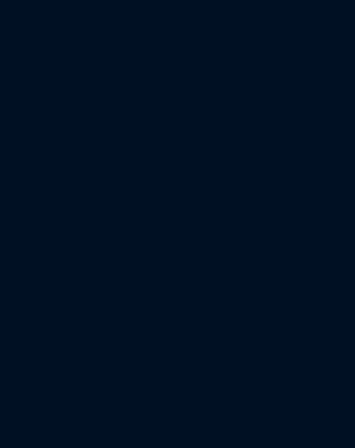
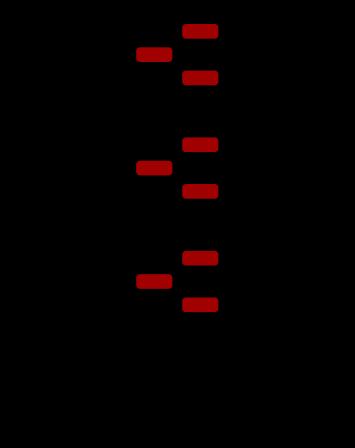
part: none -> (177, 54)
part: none -> (177, 168)
part: none -> (177, 281)

